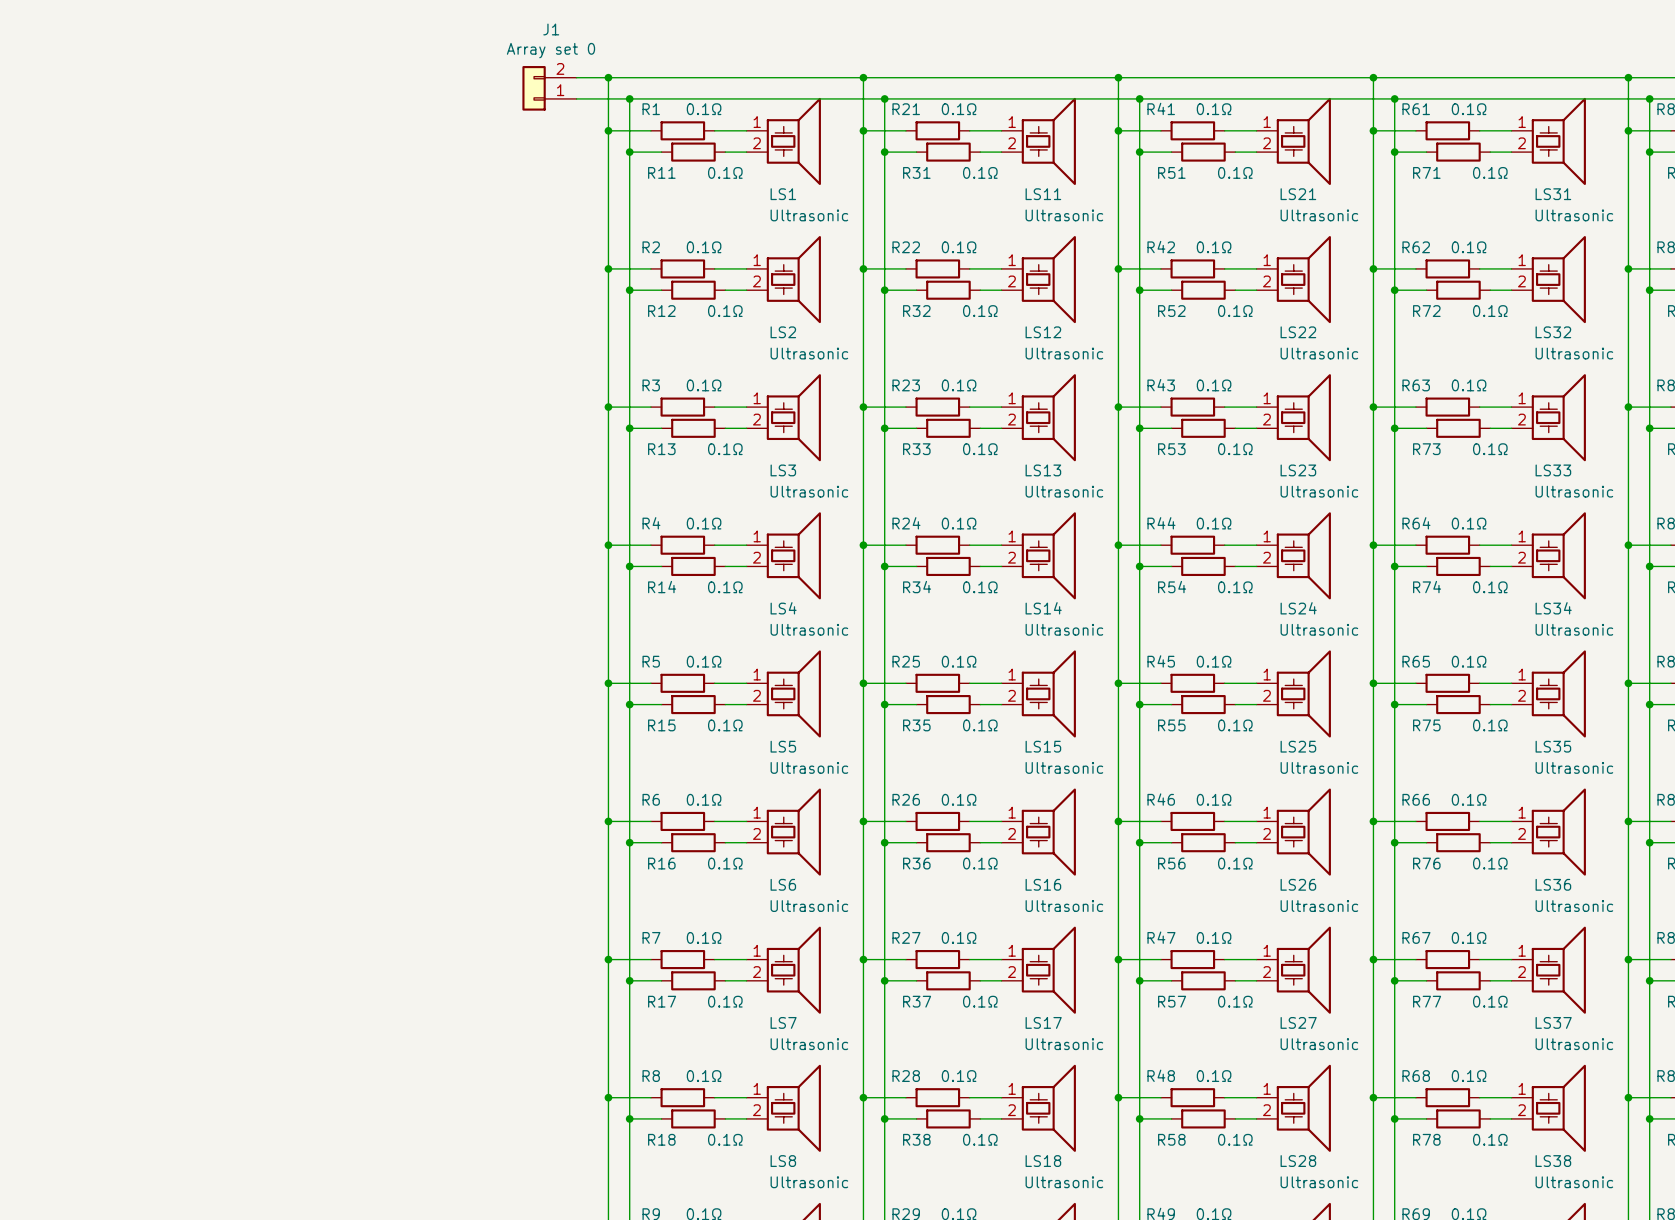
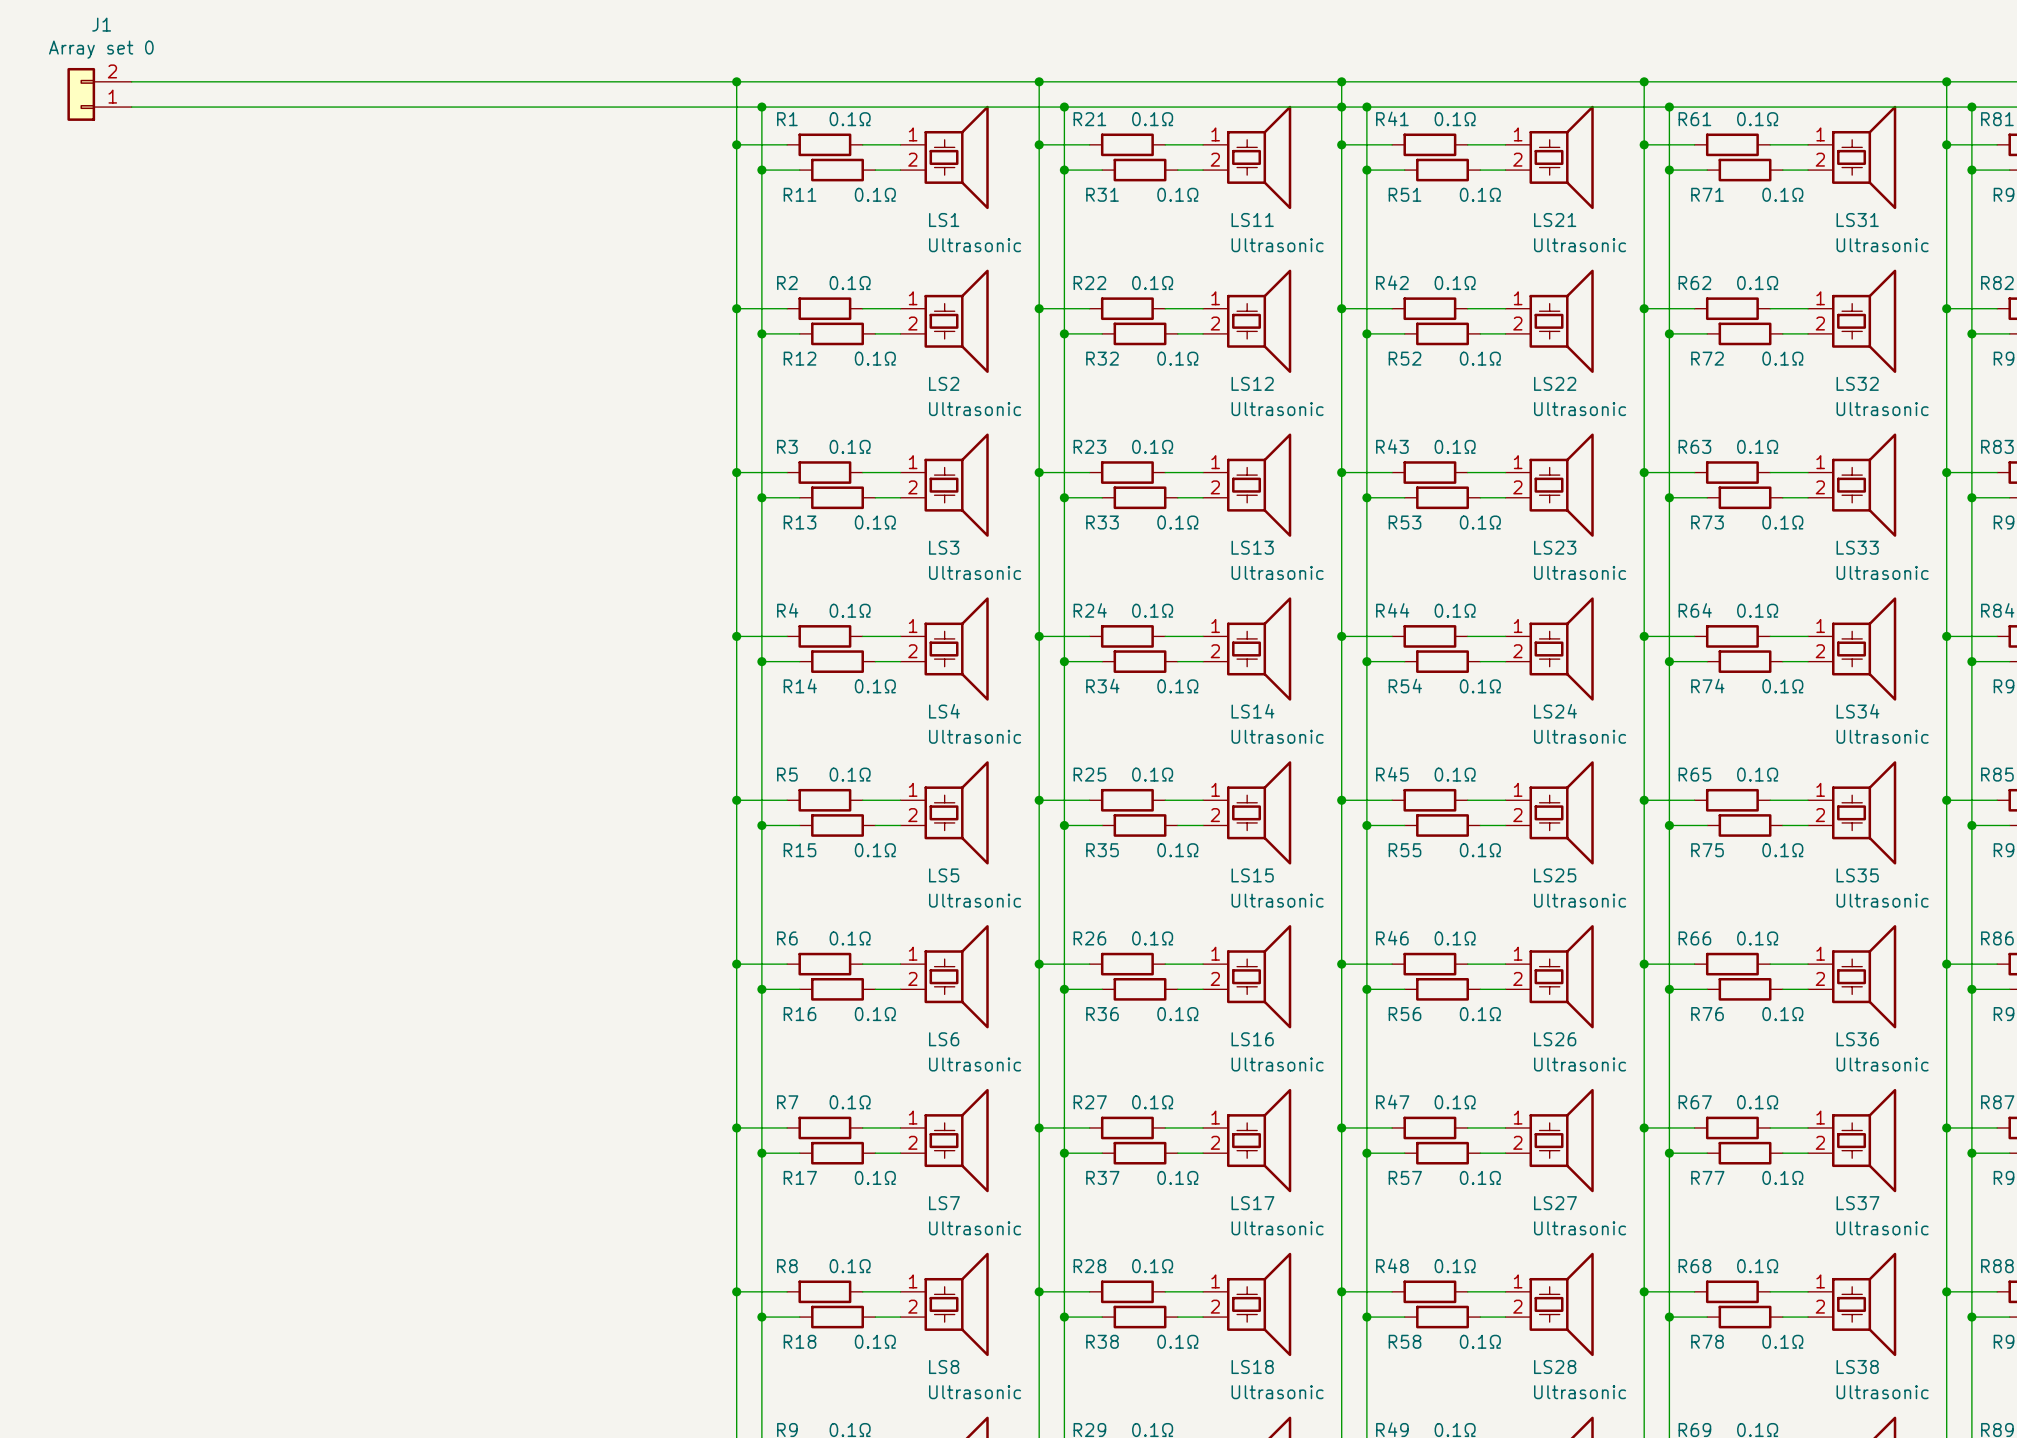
wire: none -> (131, 81) (698, 81)
J1 position: (549, 88) -> (99, 94)
wire: none -> (131, 107) (698, 107)
junction: none -> (1341, 107)

